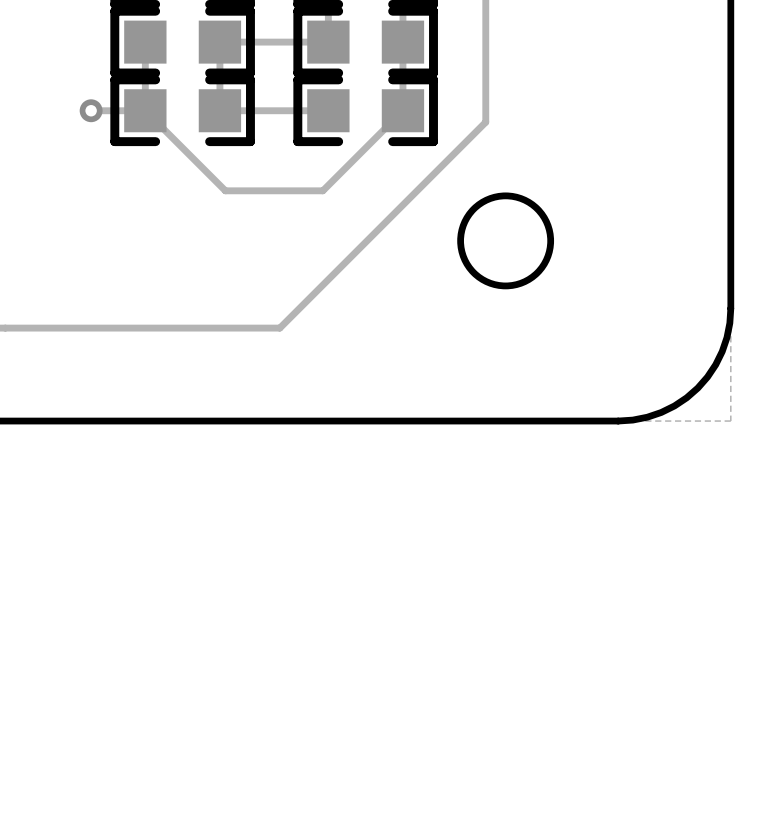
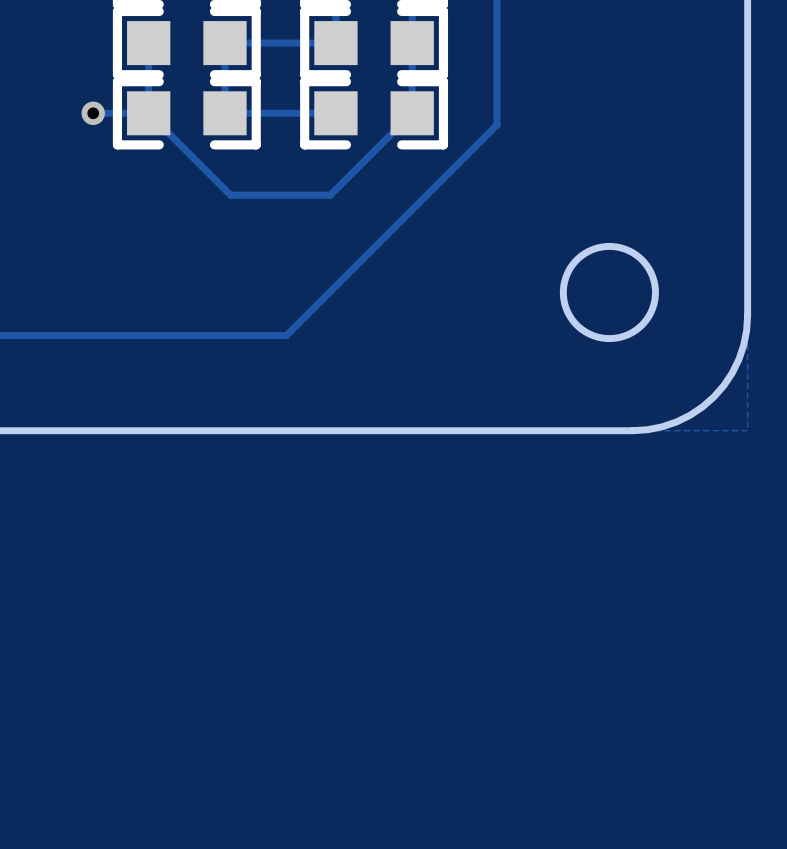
round board edge position: (505, 240) -> (609, 292)

